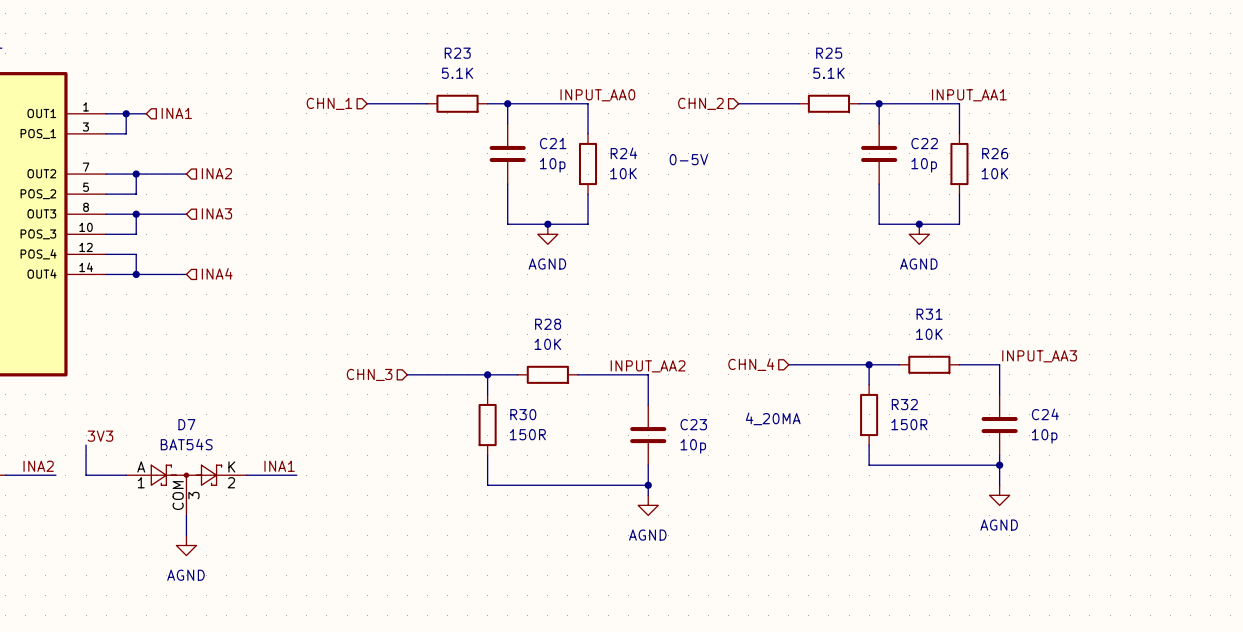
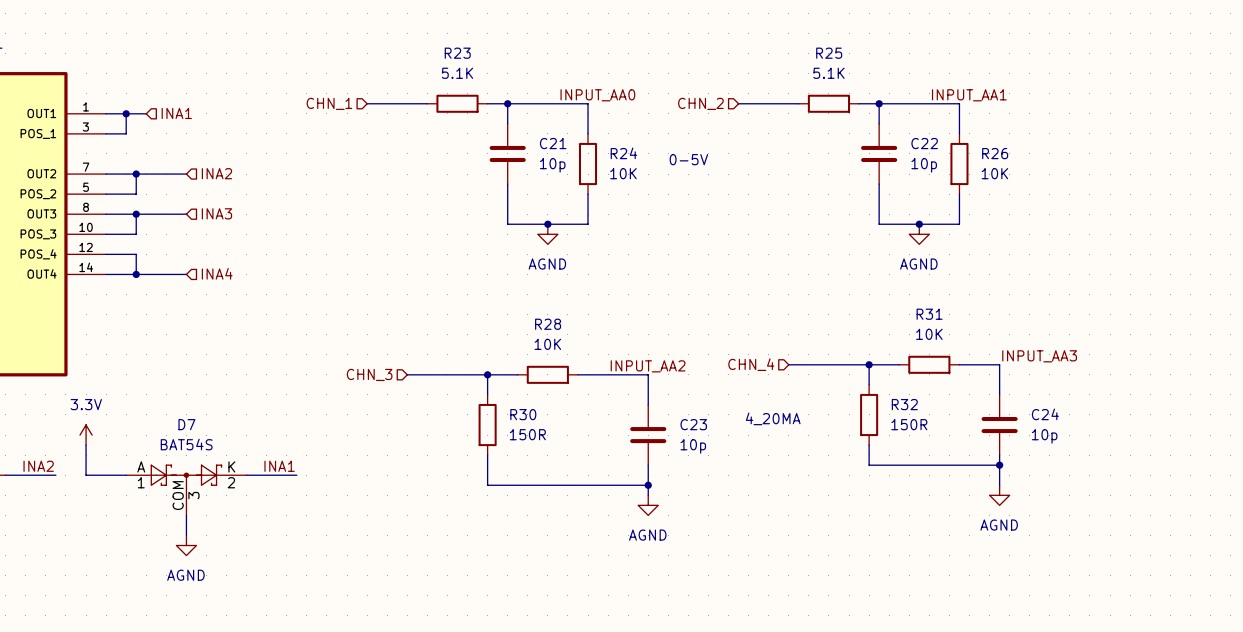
power symbol: none -> 3.3V (86, 435)
label: 3V3 (100, 436) -> none

